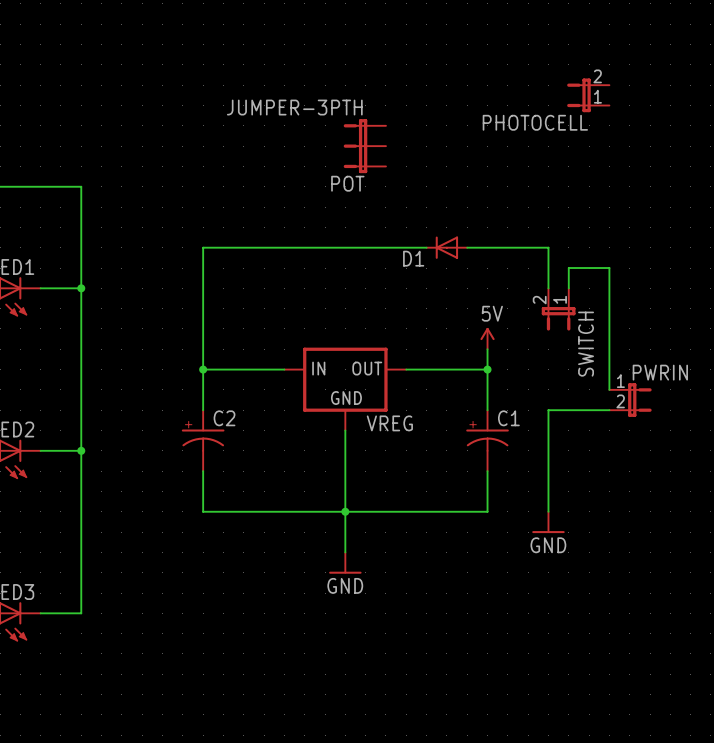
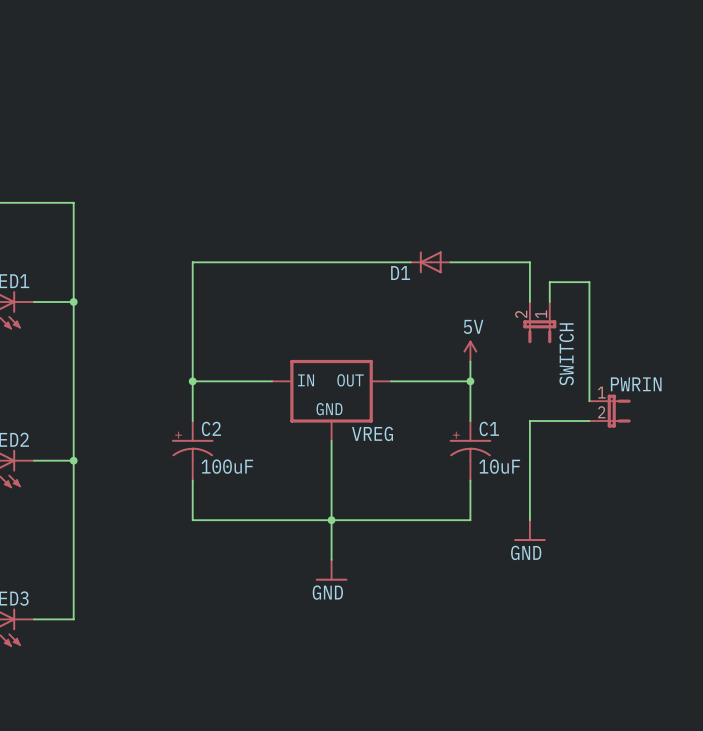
PHOTOCELL: (588, 95) -> none
POT: JUMPER-3PTH (364, 146) -> none
C2 value: none -> 100uF (227, 466)
C1 value: none -> 10uF (499, 466)

